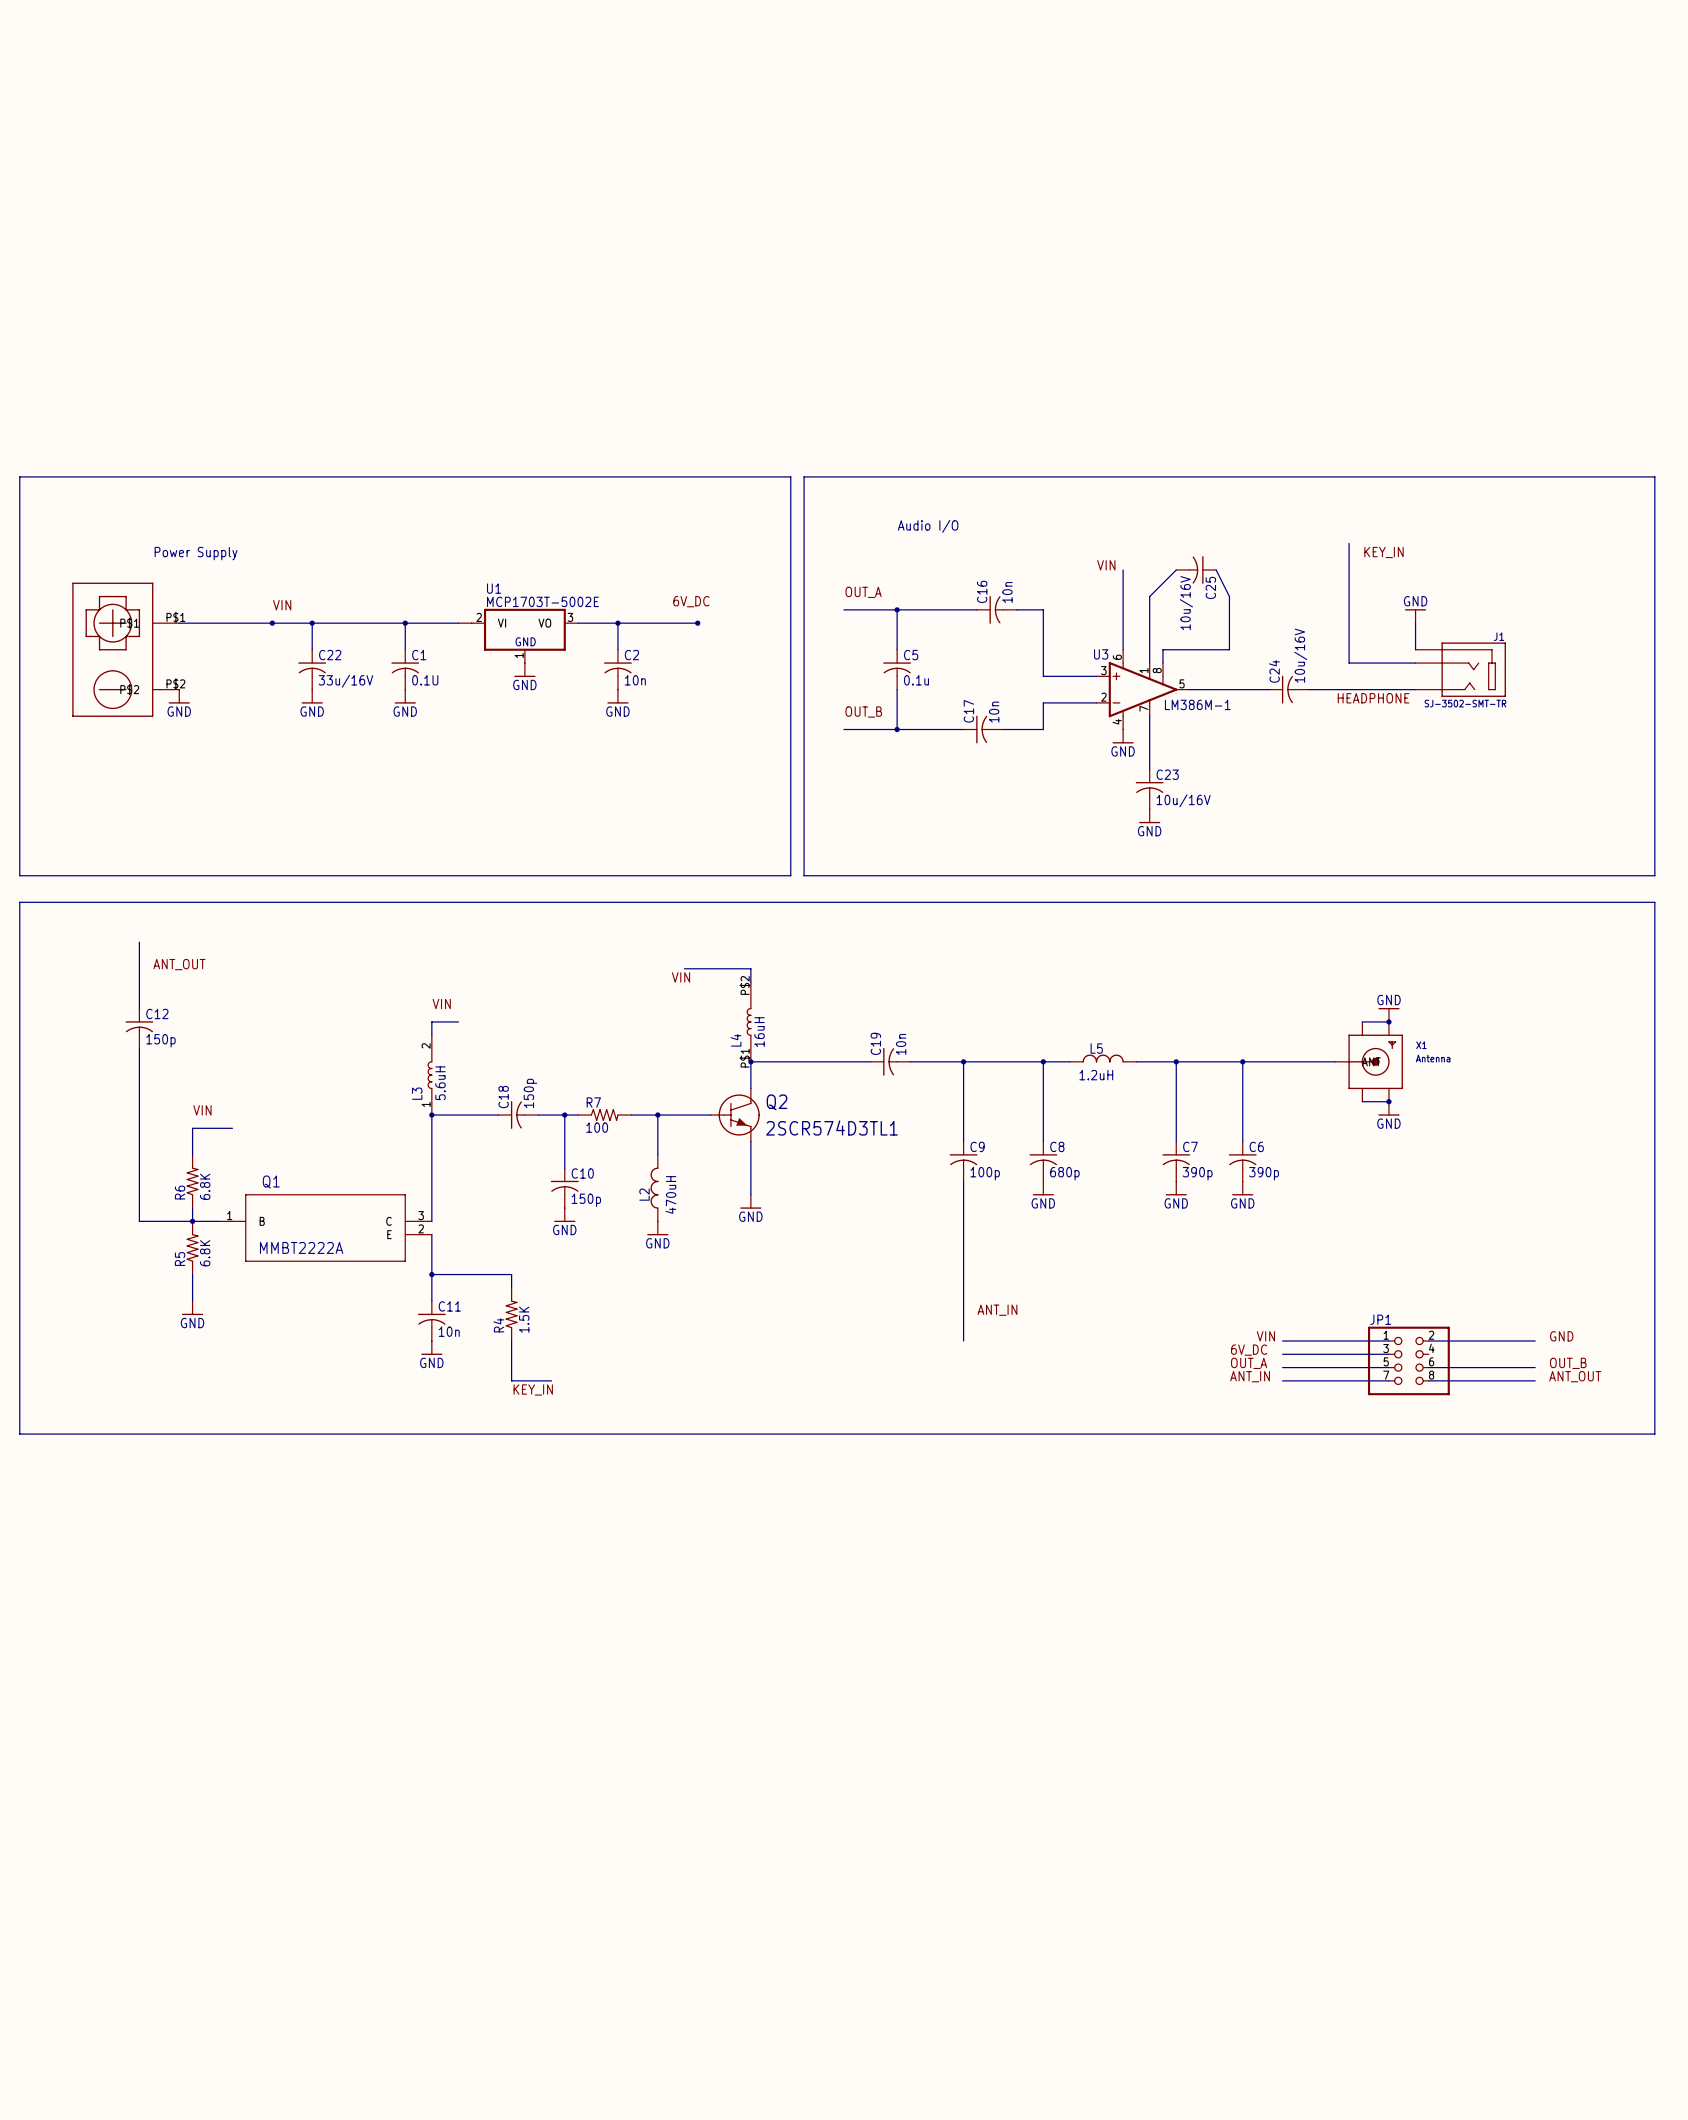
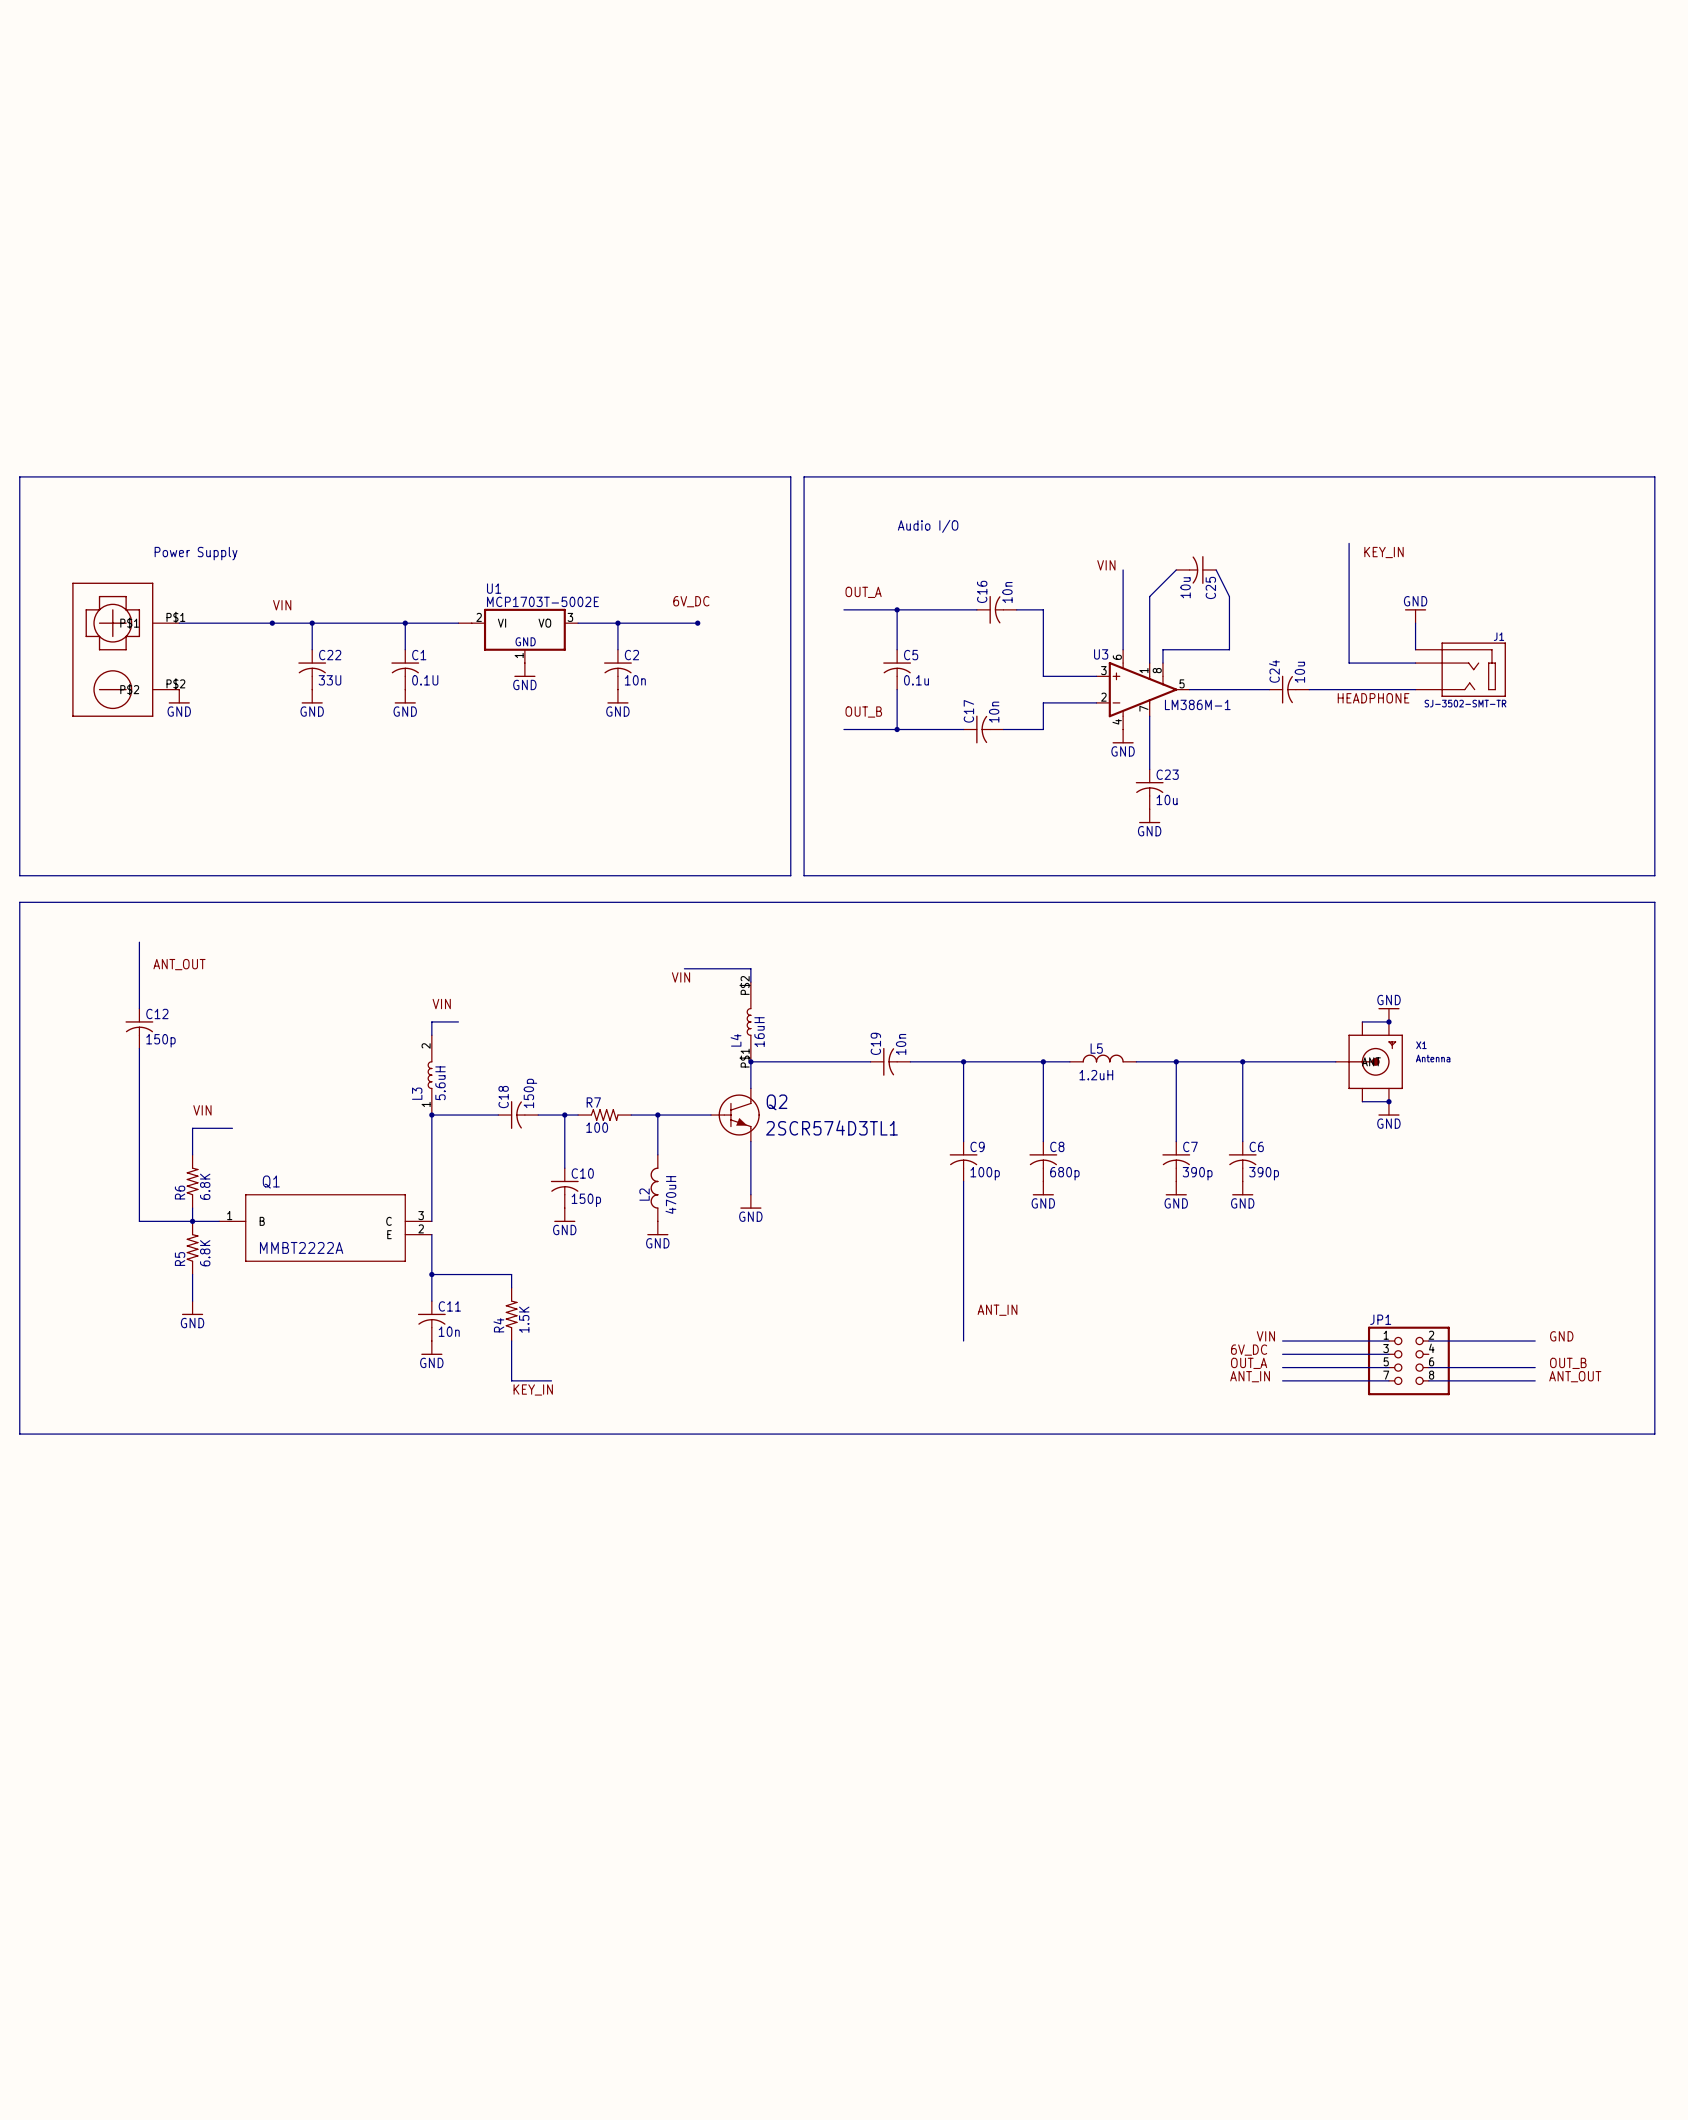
C25 value: 10u/16V (1186, 603) -> 10u (1185, 587)
C24 value: 10u/16V (1300, 655) -> 10u (1299, 672)
C22 value: 33u/16V (345, 681) -> 33U (329, 680)
C23 value: 10u/16V (1183, 800) -> 10u (1167, 799)

